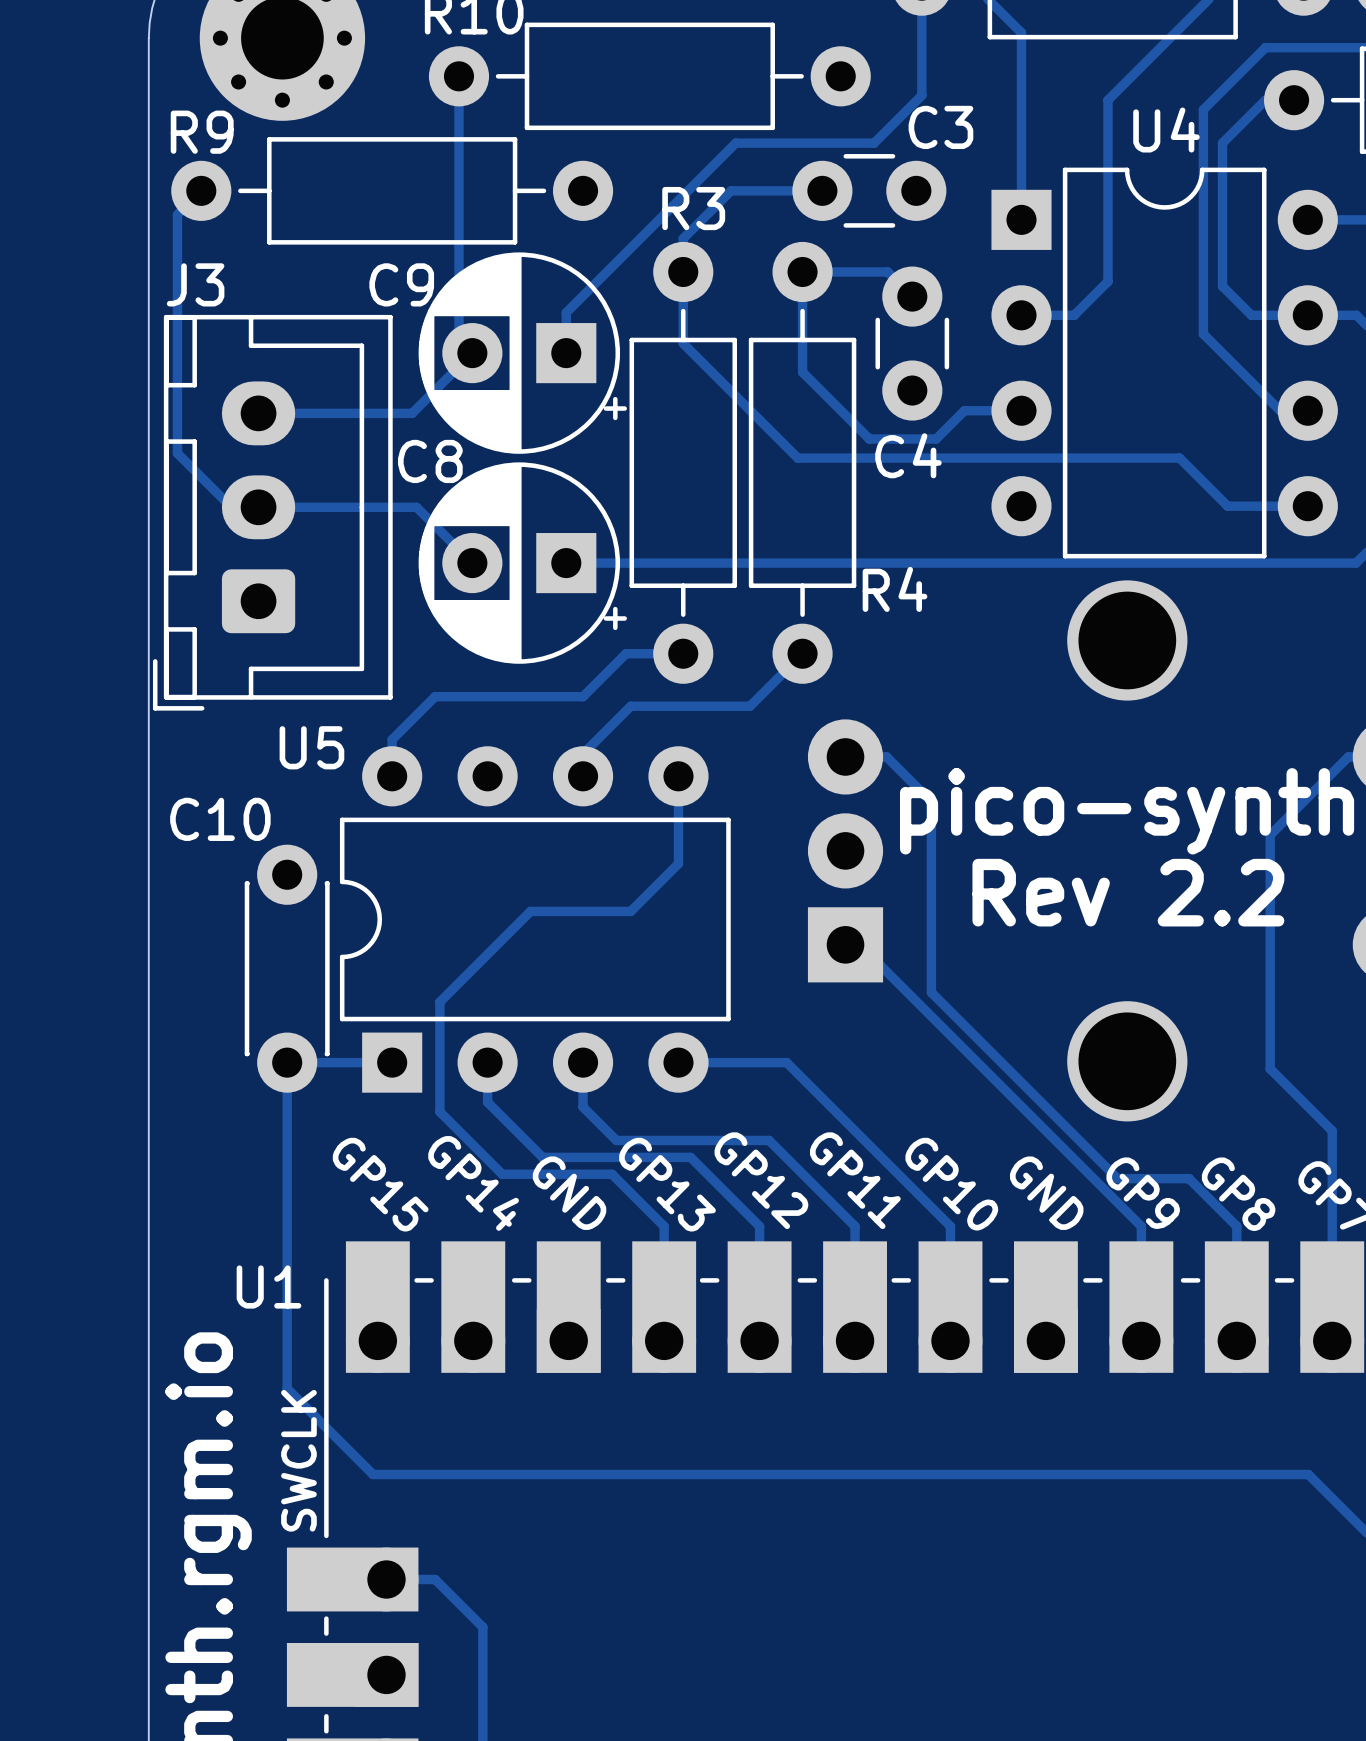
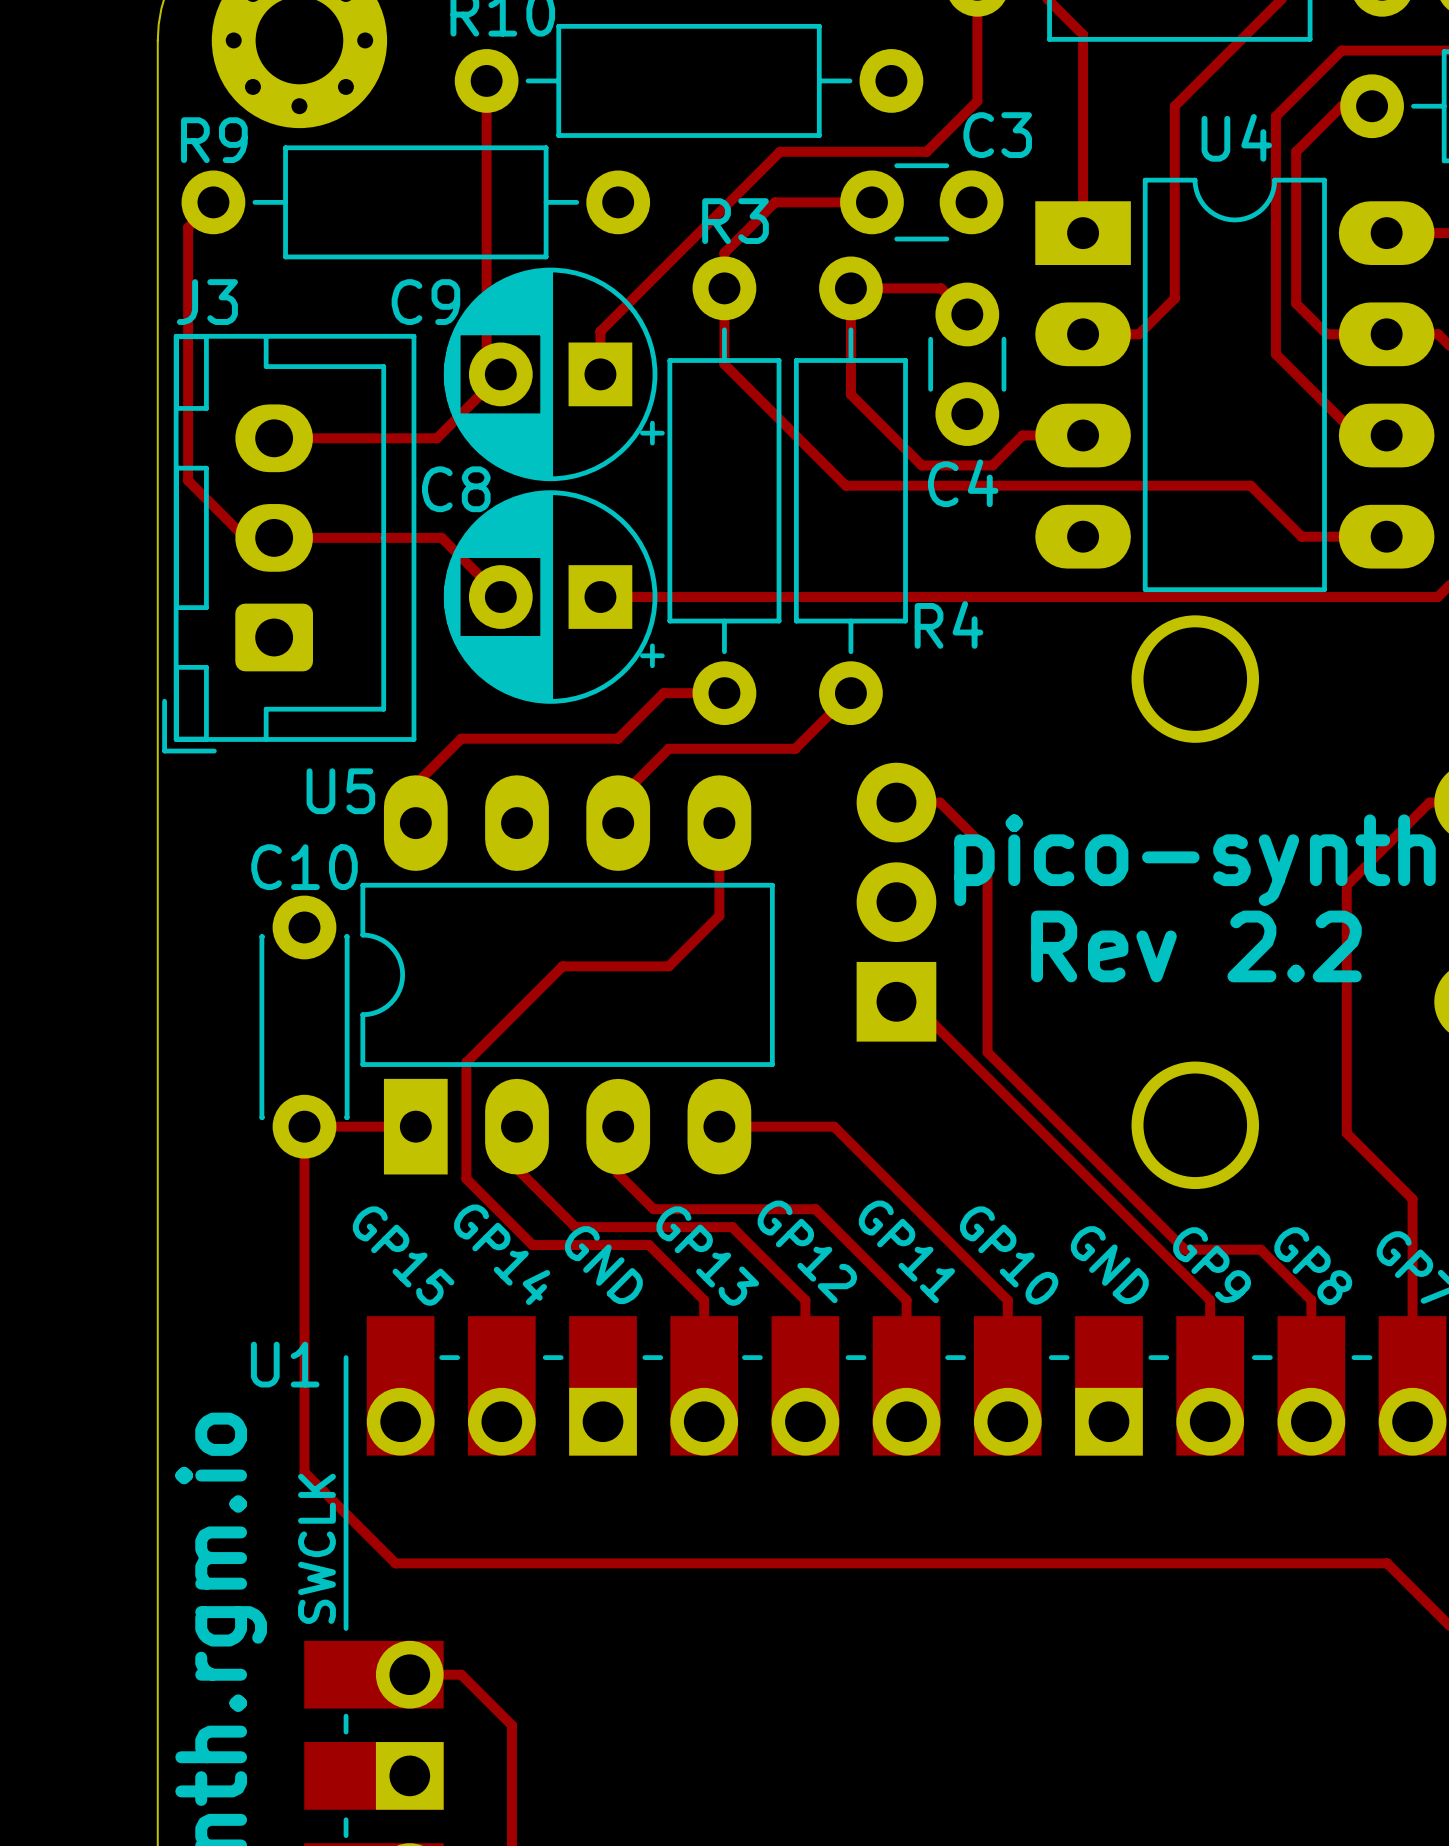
U4 footprint: [991, 167, 1338, 559] -> [1035, 177, 1435, 593]
U5 footprint: [339, 746, 731, 1093] -> [360, 775, 775, 1175]
C10 name position: C10 (220, 819) -> C10 (304, 867)

